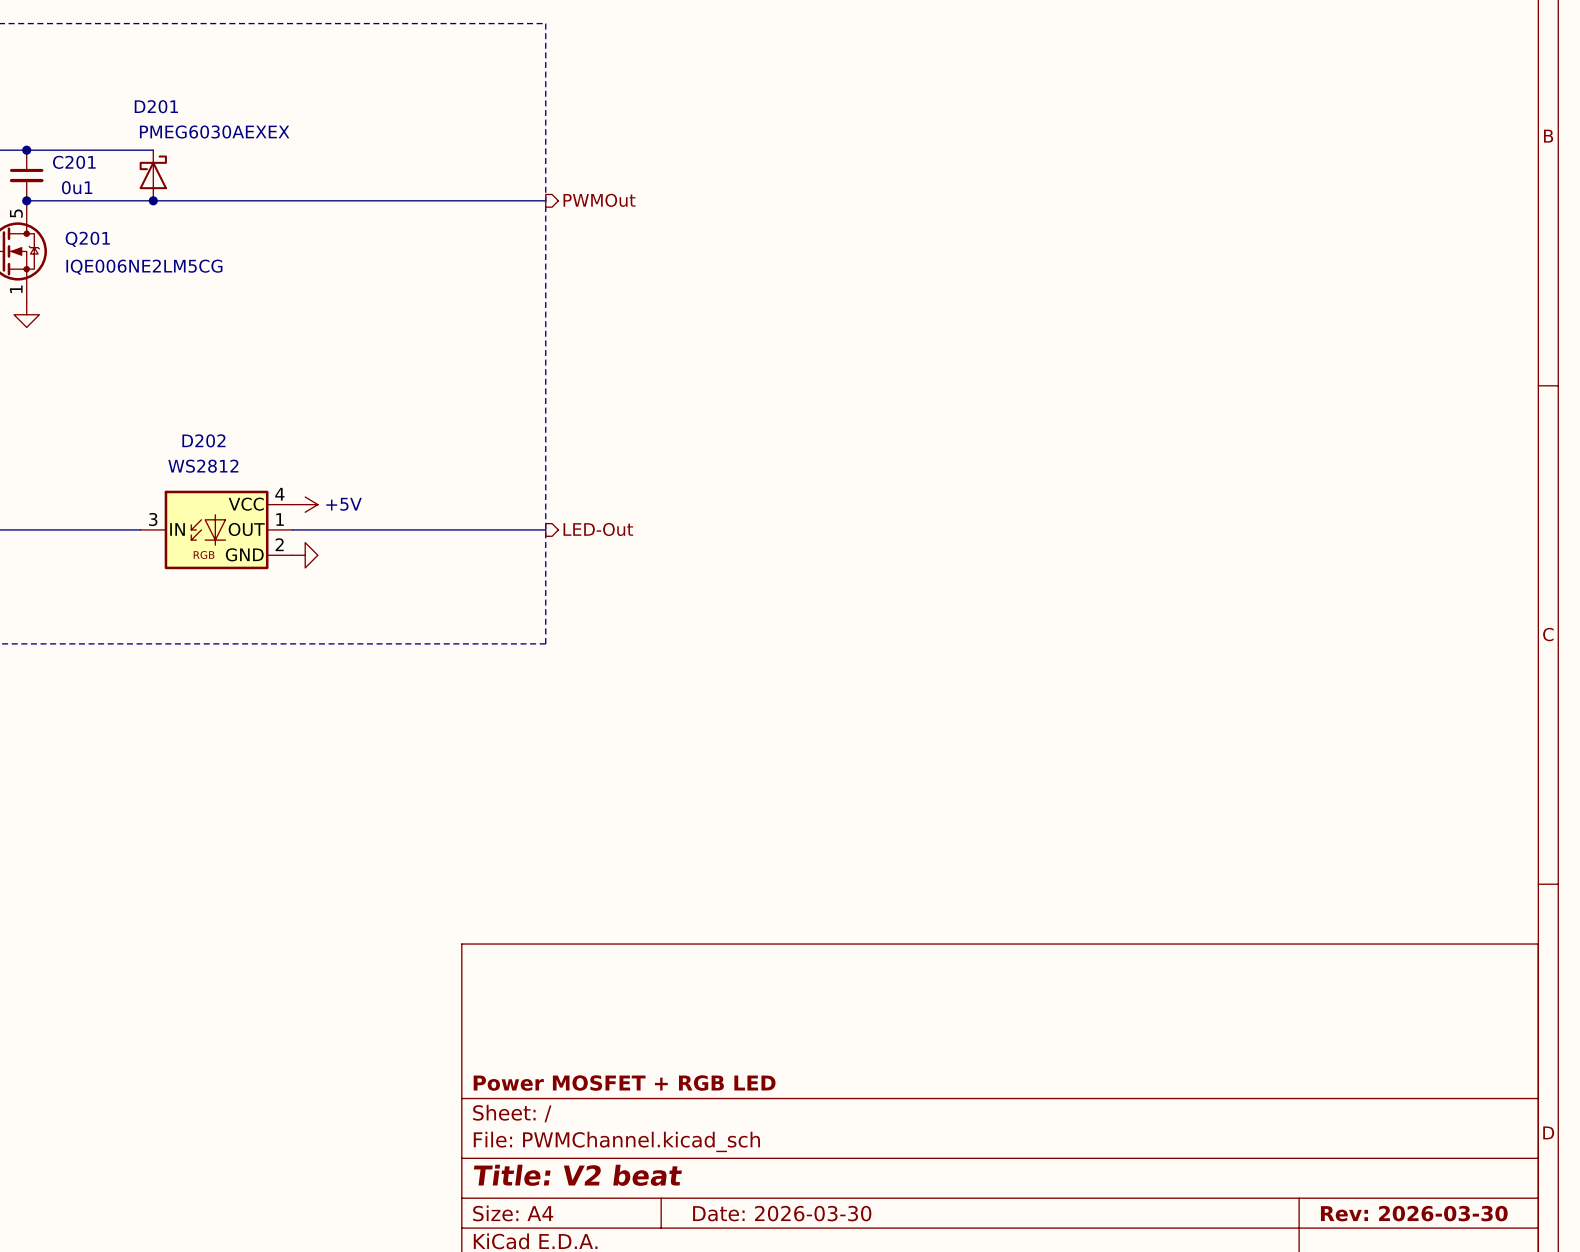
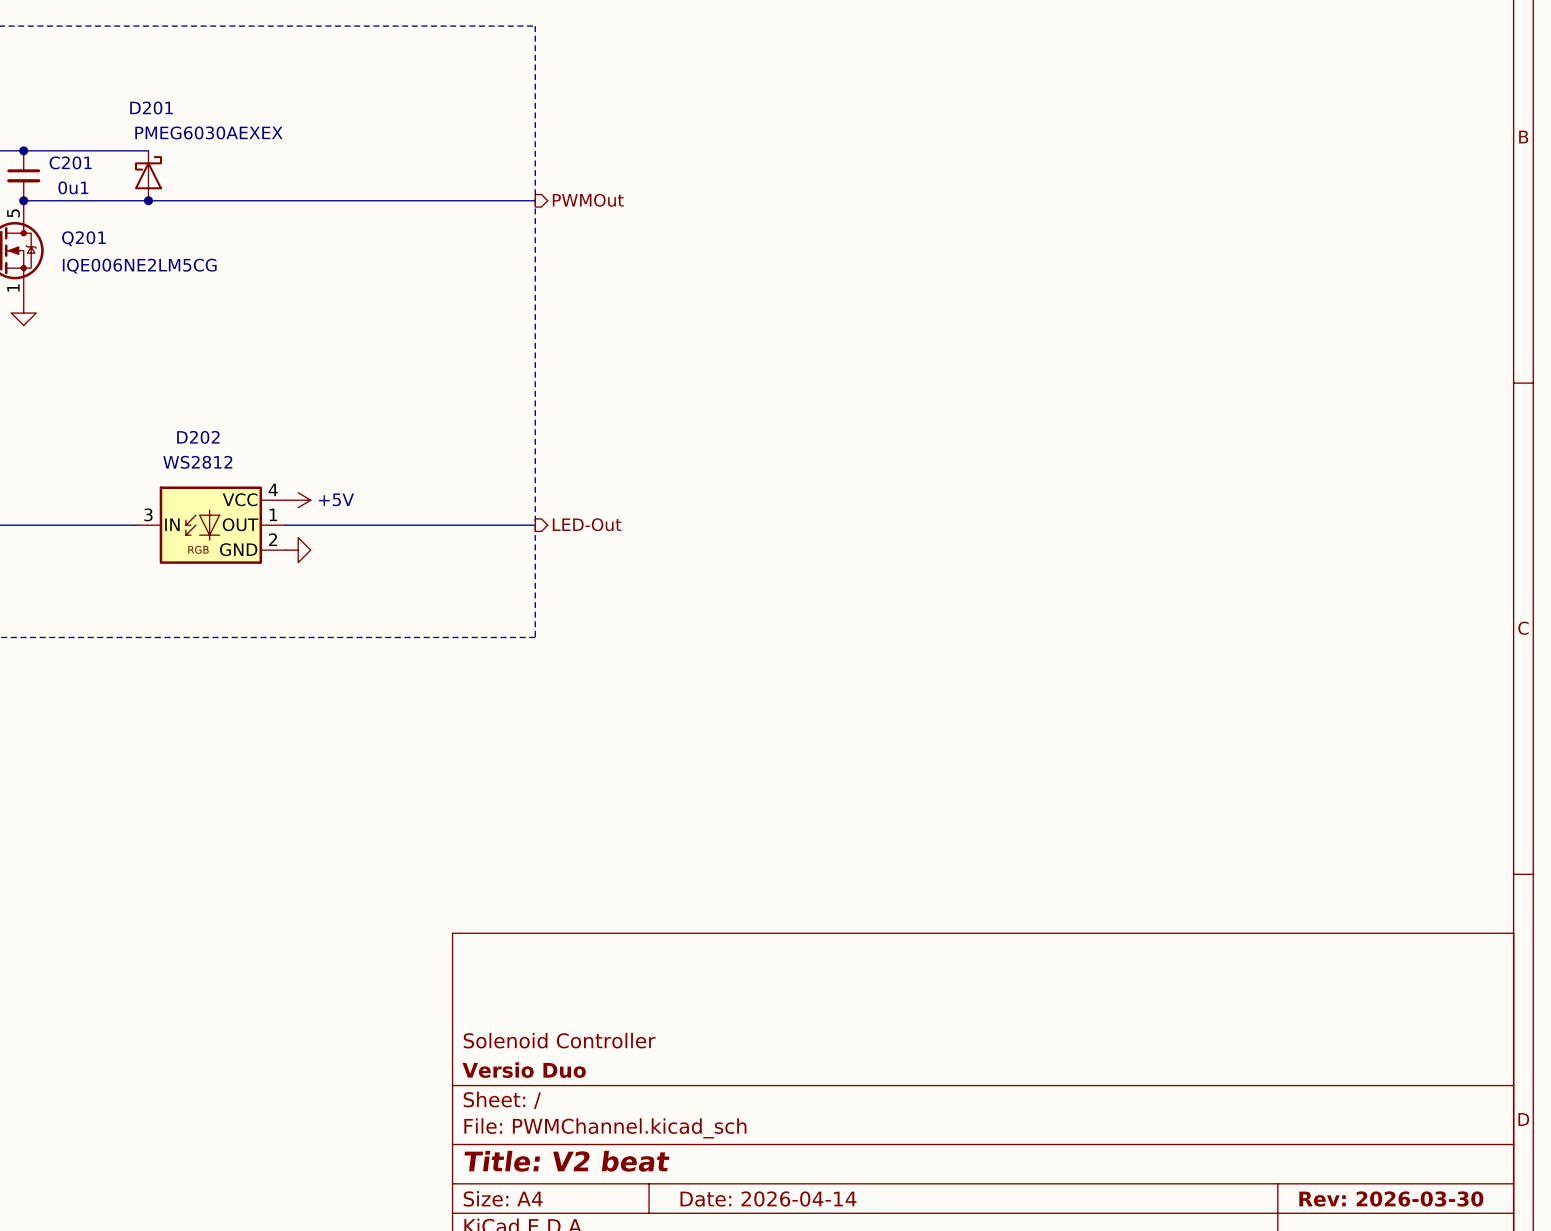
title block: none -> Solenoid Controller (559, 1040)
title block: Power MOSFET + RGB LED (624, 1083) -> Versio Duo (524, 1070)
title block: Date: 2026-03-30 (782, 1213) -> Date: 2026-04-14 (768, 1198)

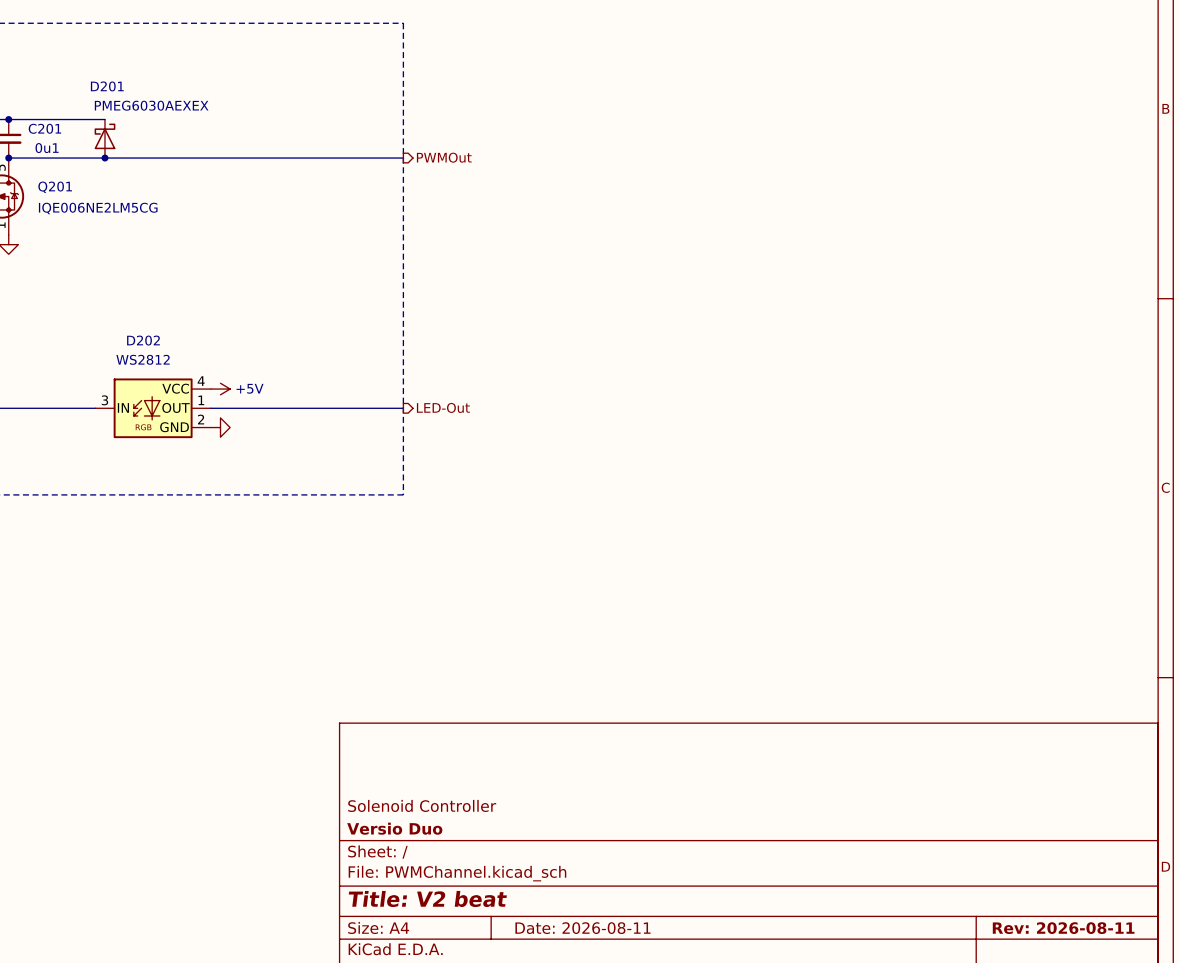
title block: Date: 2026-04-14 (768, 1198) -> Date: 2026-08-11 (582, 928)
title block: Rev: 2026-03-30 (1391, 1198) -> Rev: 2026-08-11 (1063, 928)

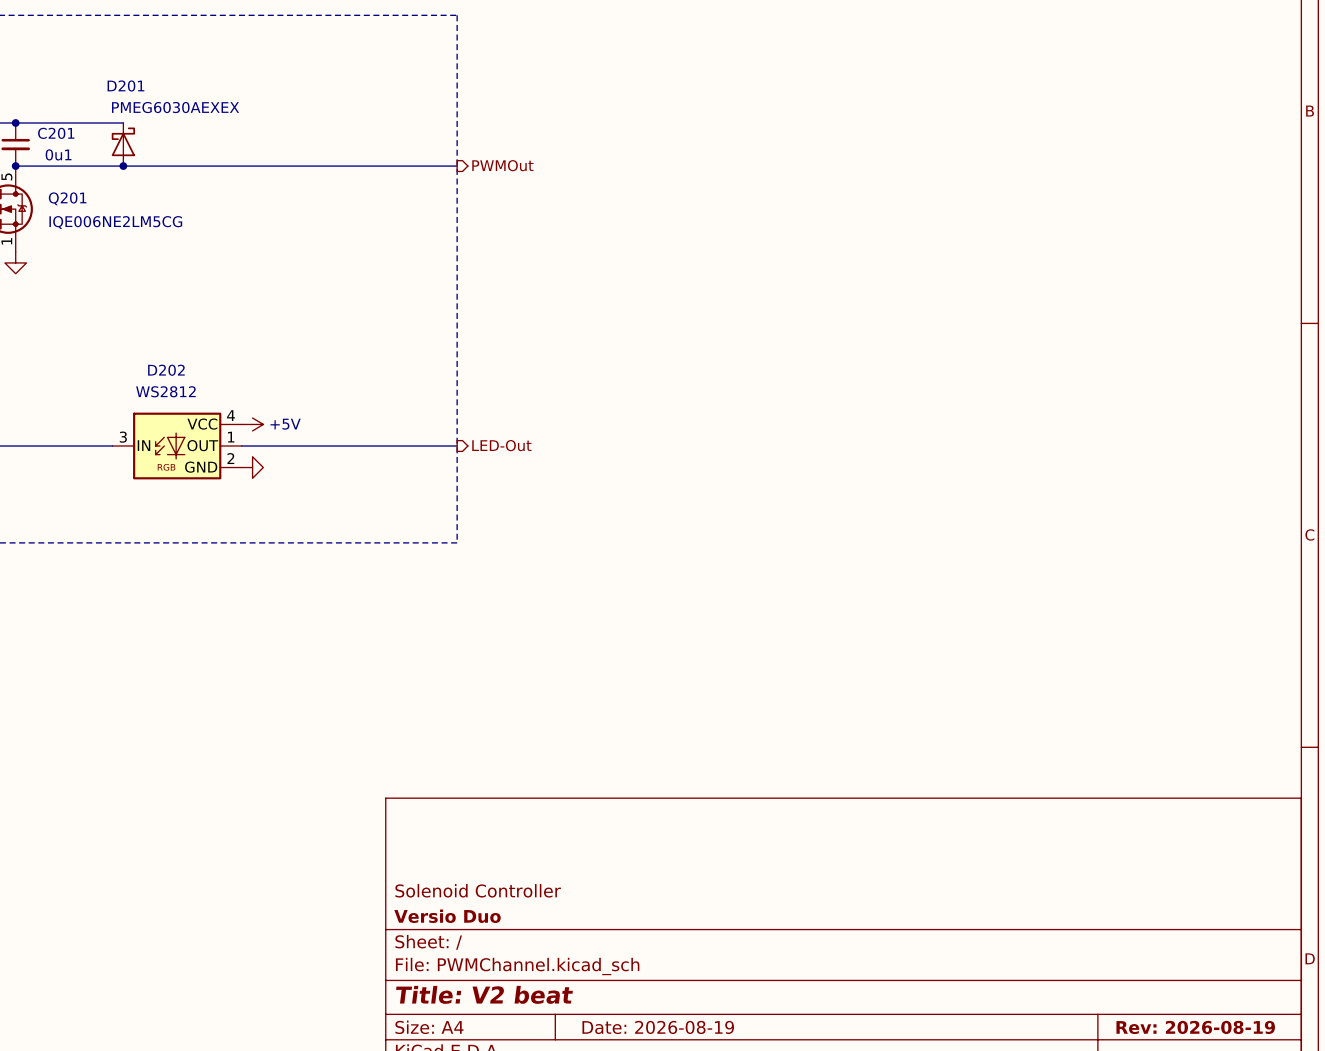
title block: Date: 2026-08-11 (582, 928) -> Date: 2026-08-19 (658, 1027)
title block: Rev: 2026-08-11 (1063, 928) -> Rev: 2026-08-19 (1195, 1027)

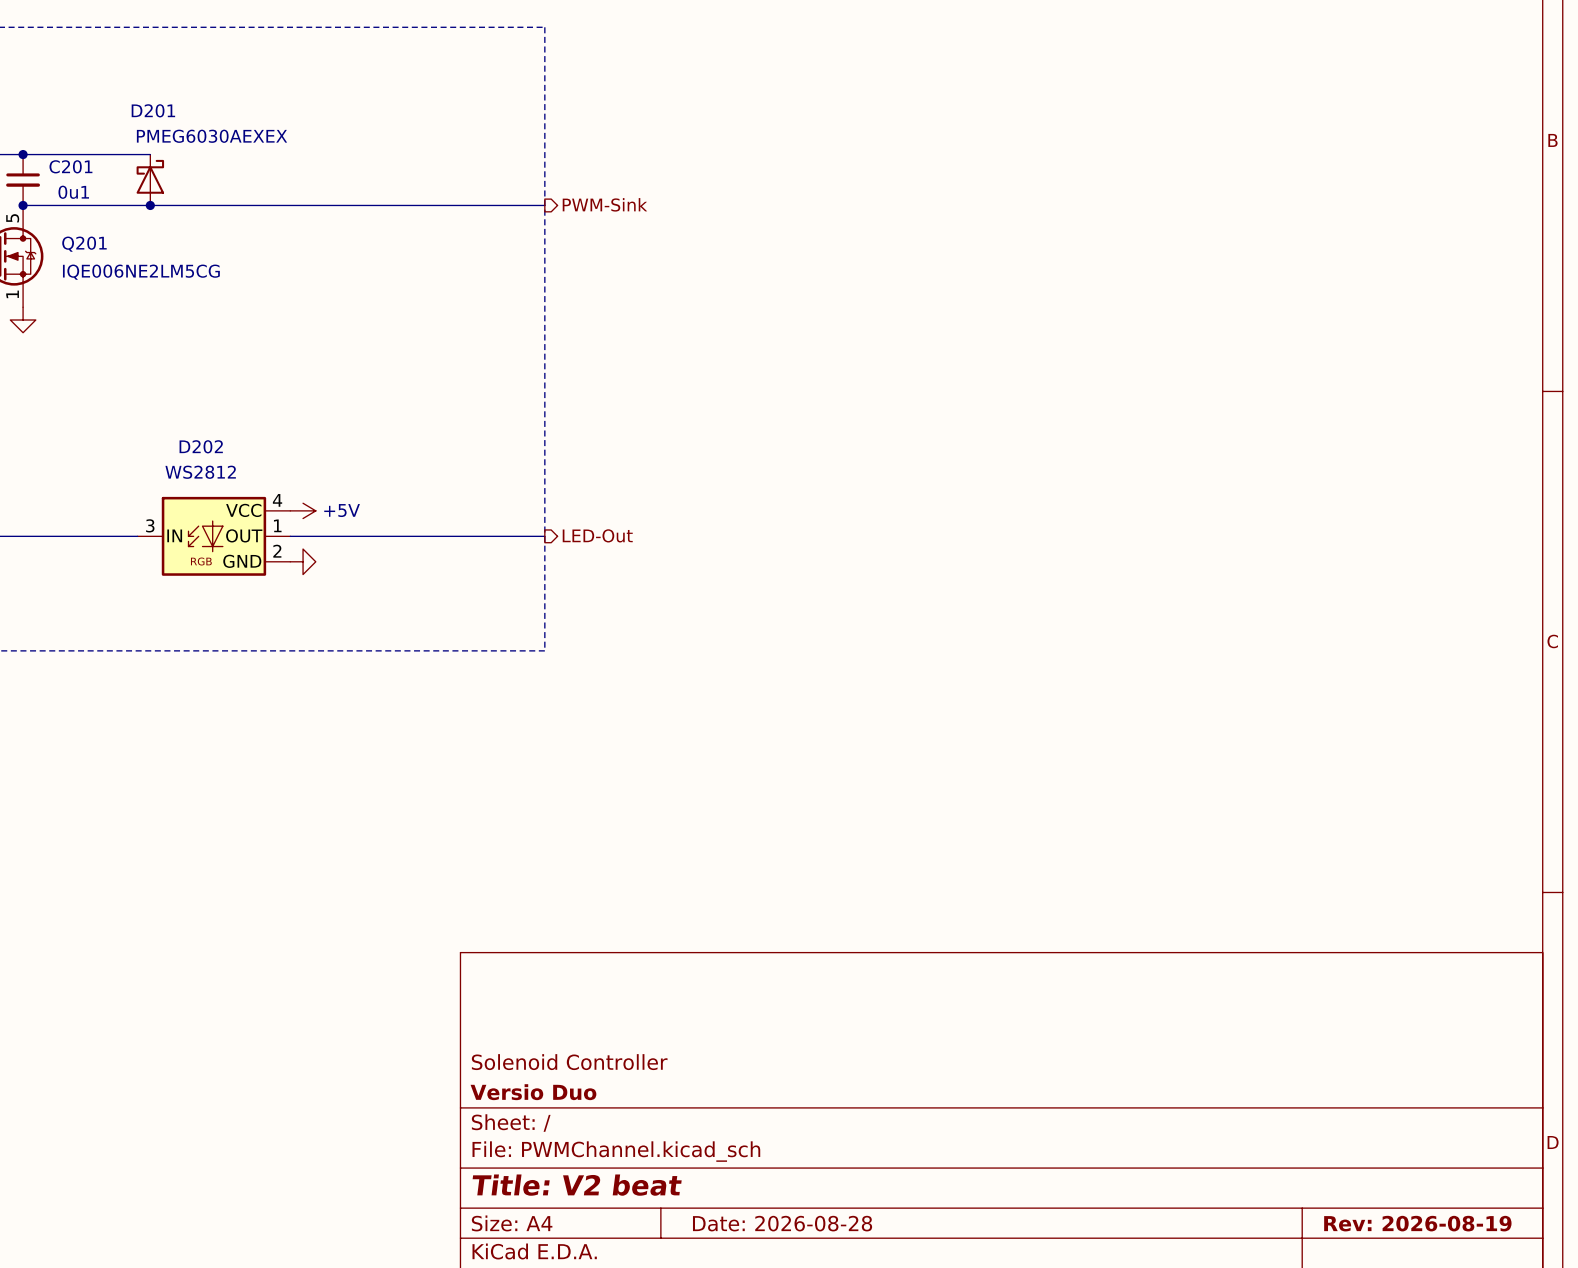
hierarchical label: PWMOut (502, 165) -> PWM-Sink (604, 204)
title block: Date: 2026-08-19 (658, 1027) -> Date: 2026-08-28 (782, 1223)

